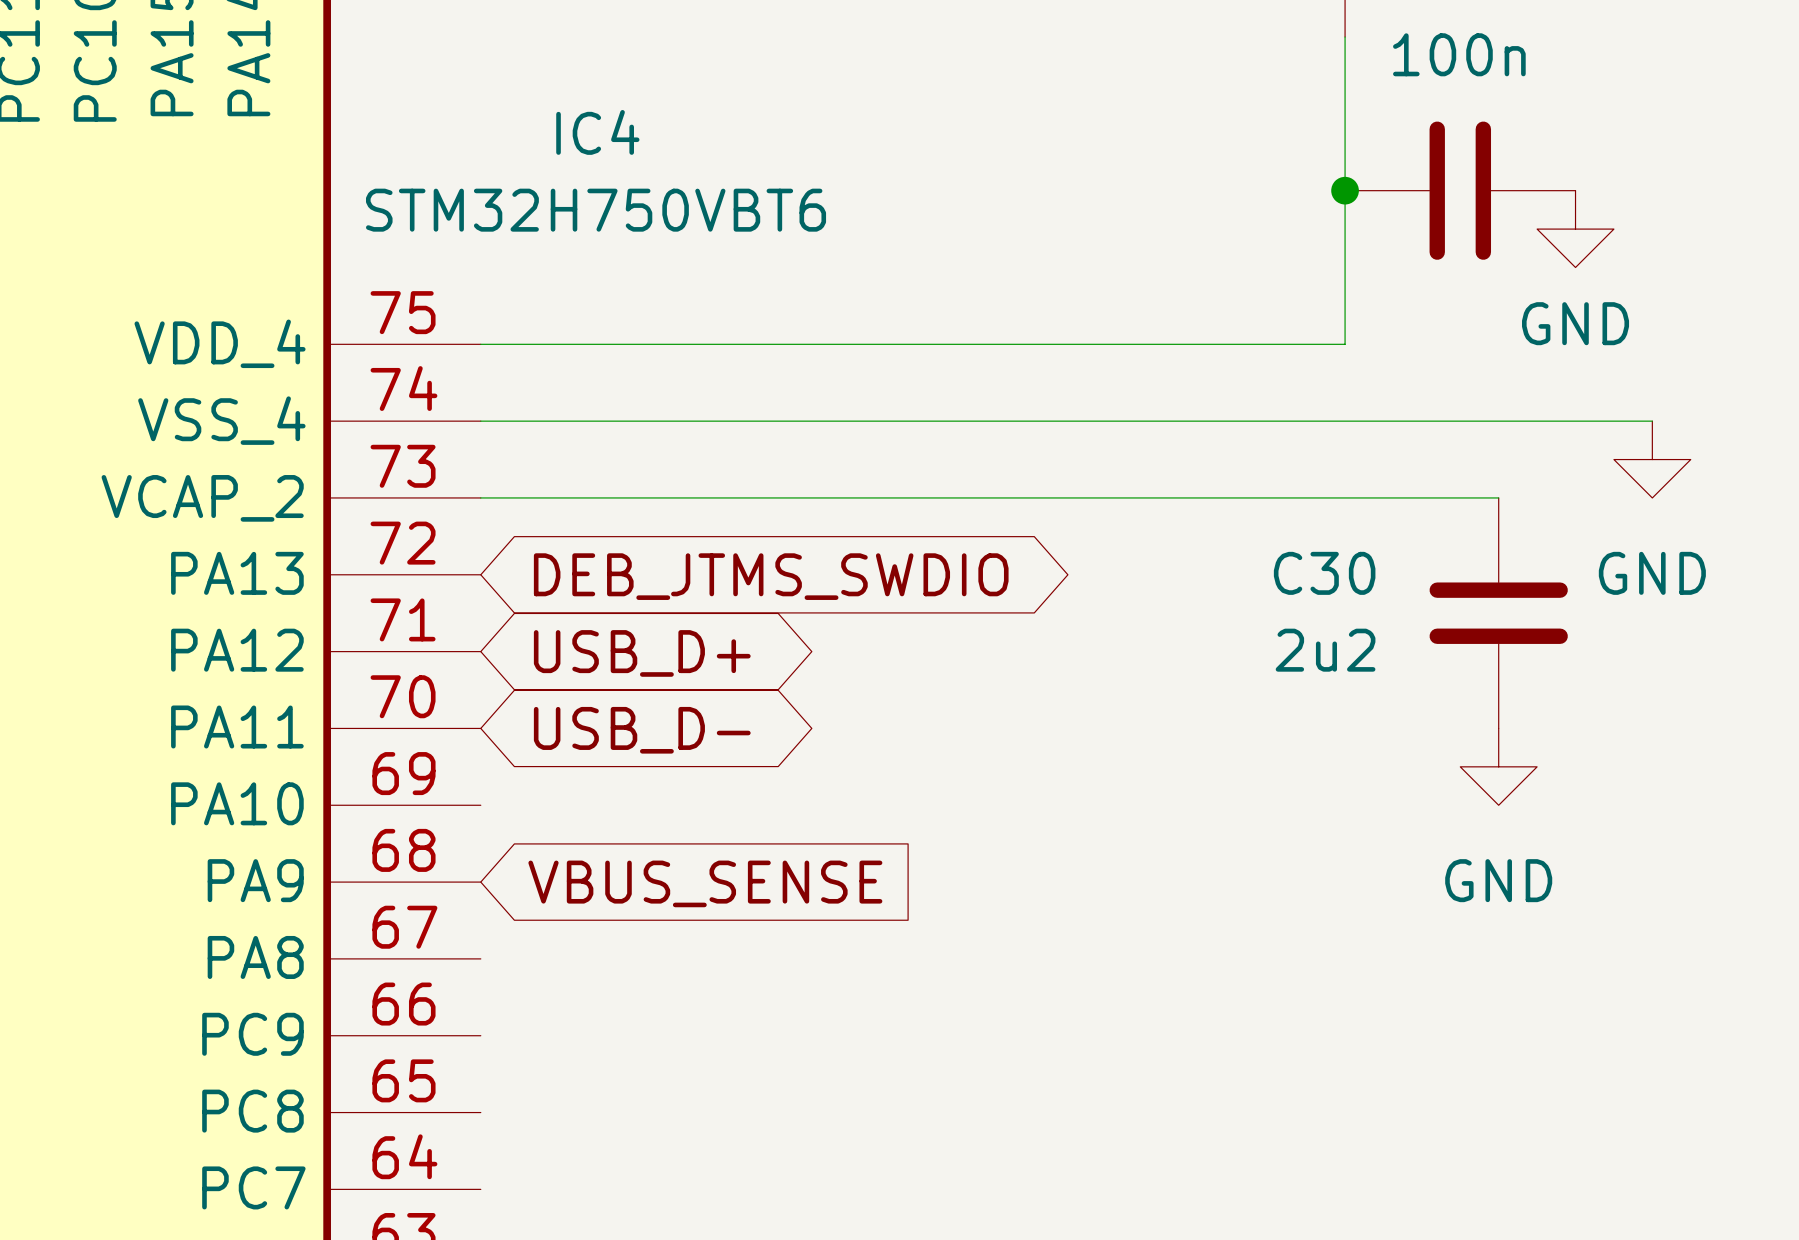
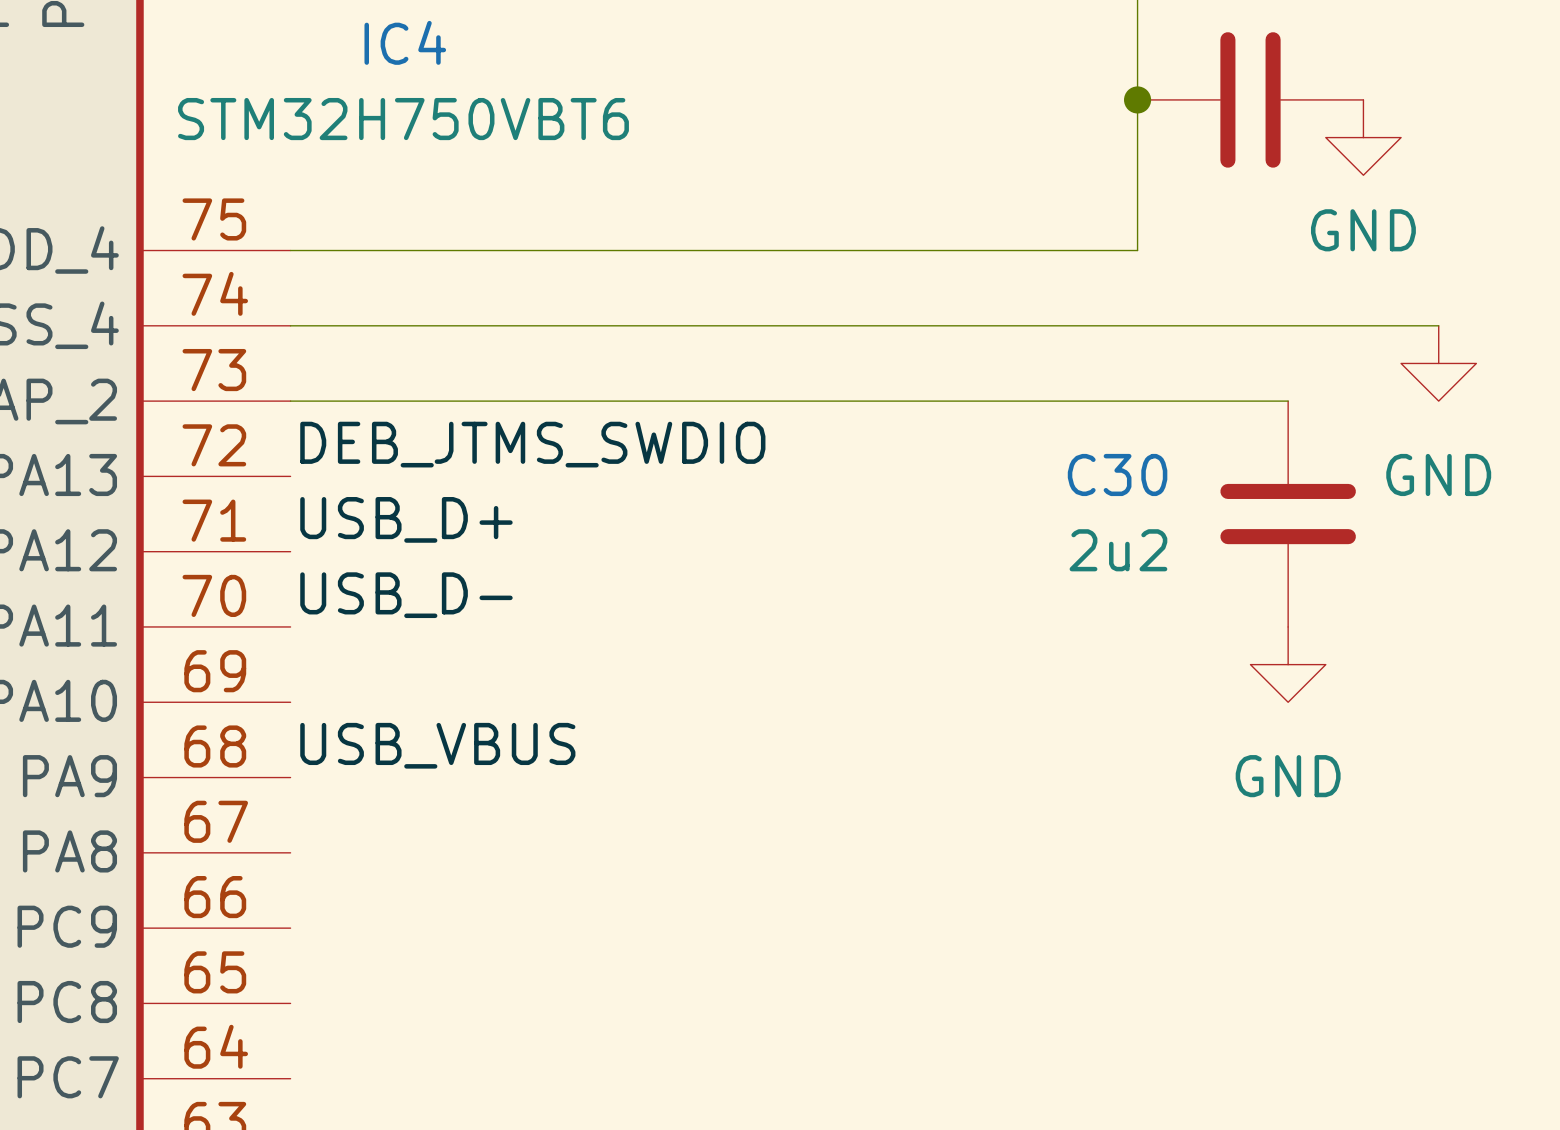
label: none -> DEB_JTMS_SWDIO (532, 444)
global label: DEB_JTMS_SWDIO (771, 576) -> none
label: none -> USB_D+ (406, 519)
global label: USB_D+ (642, 653) -> none
label: none -> USB_D- (406, 595)
global label: USB_D- (642, 730) -> none
label: none -> USB_VBUS (437, 745)
global label: VBUS_SENSE (705, 883) -> none

